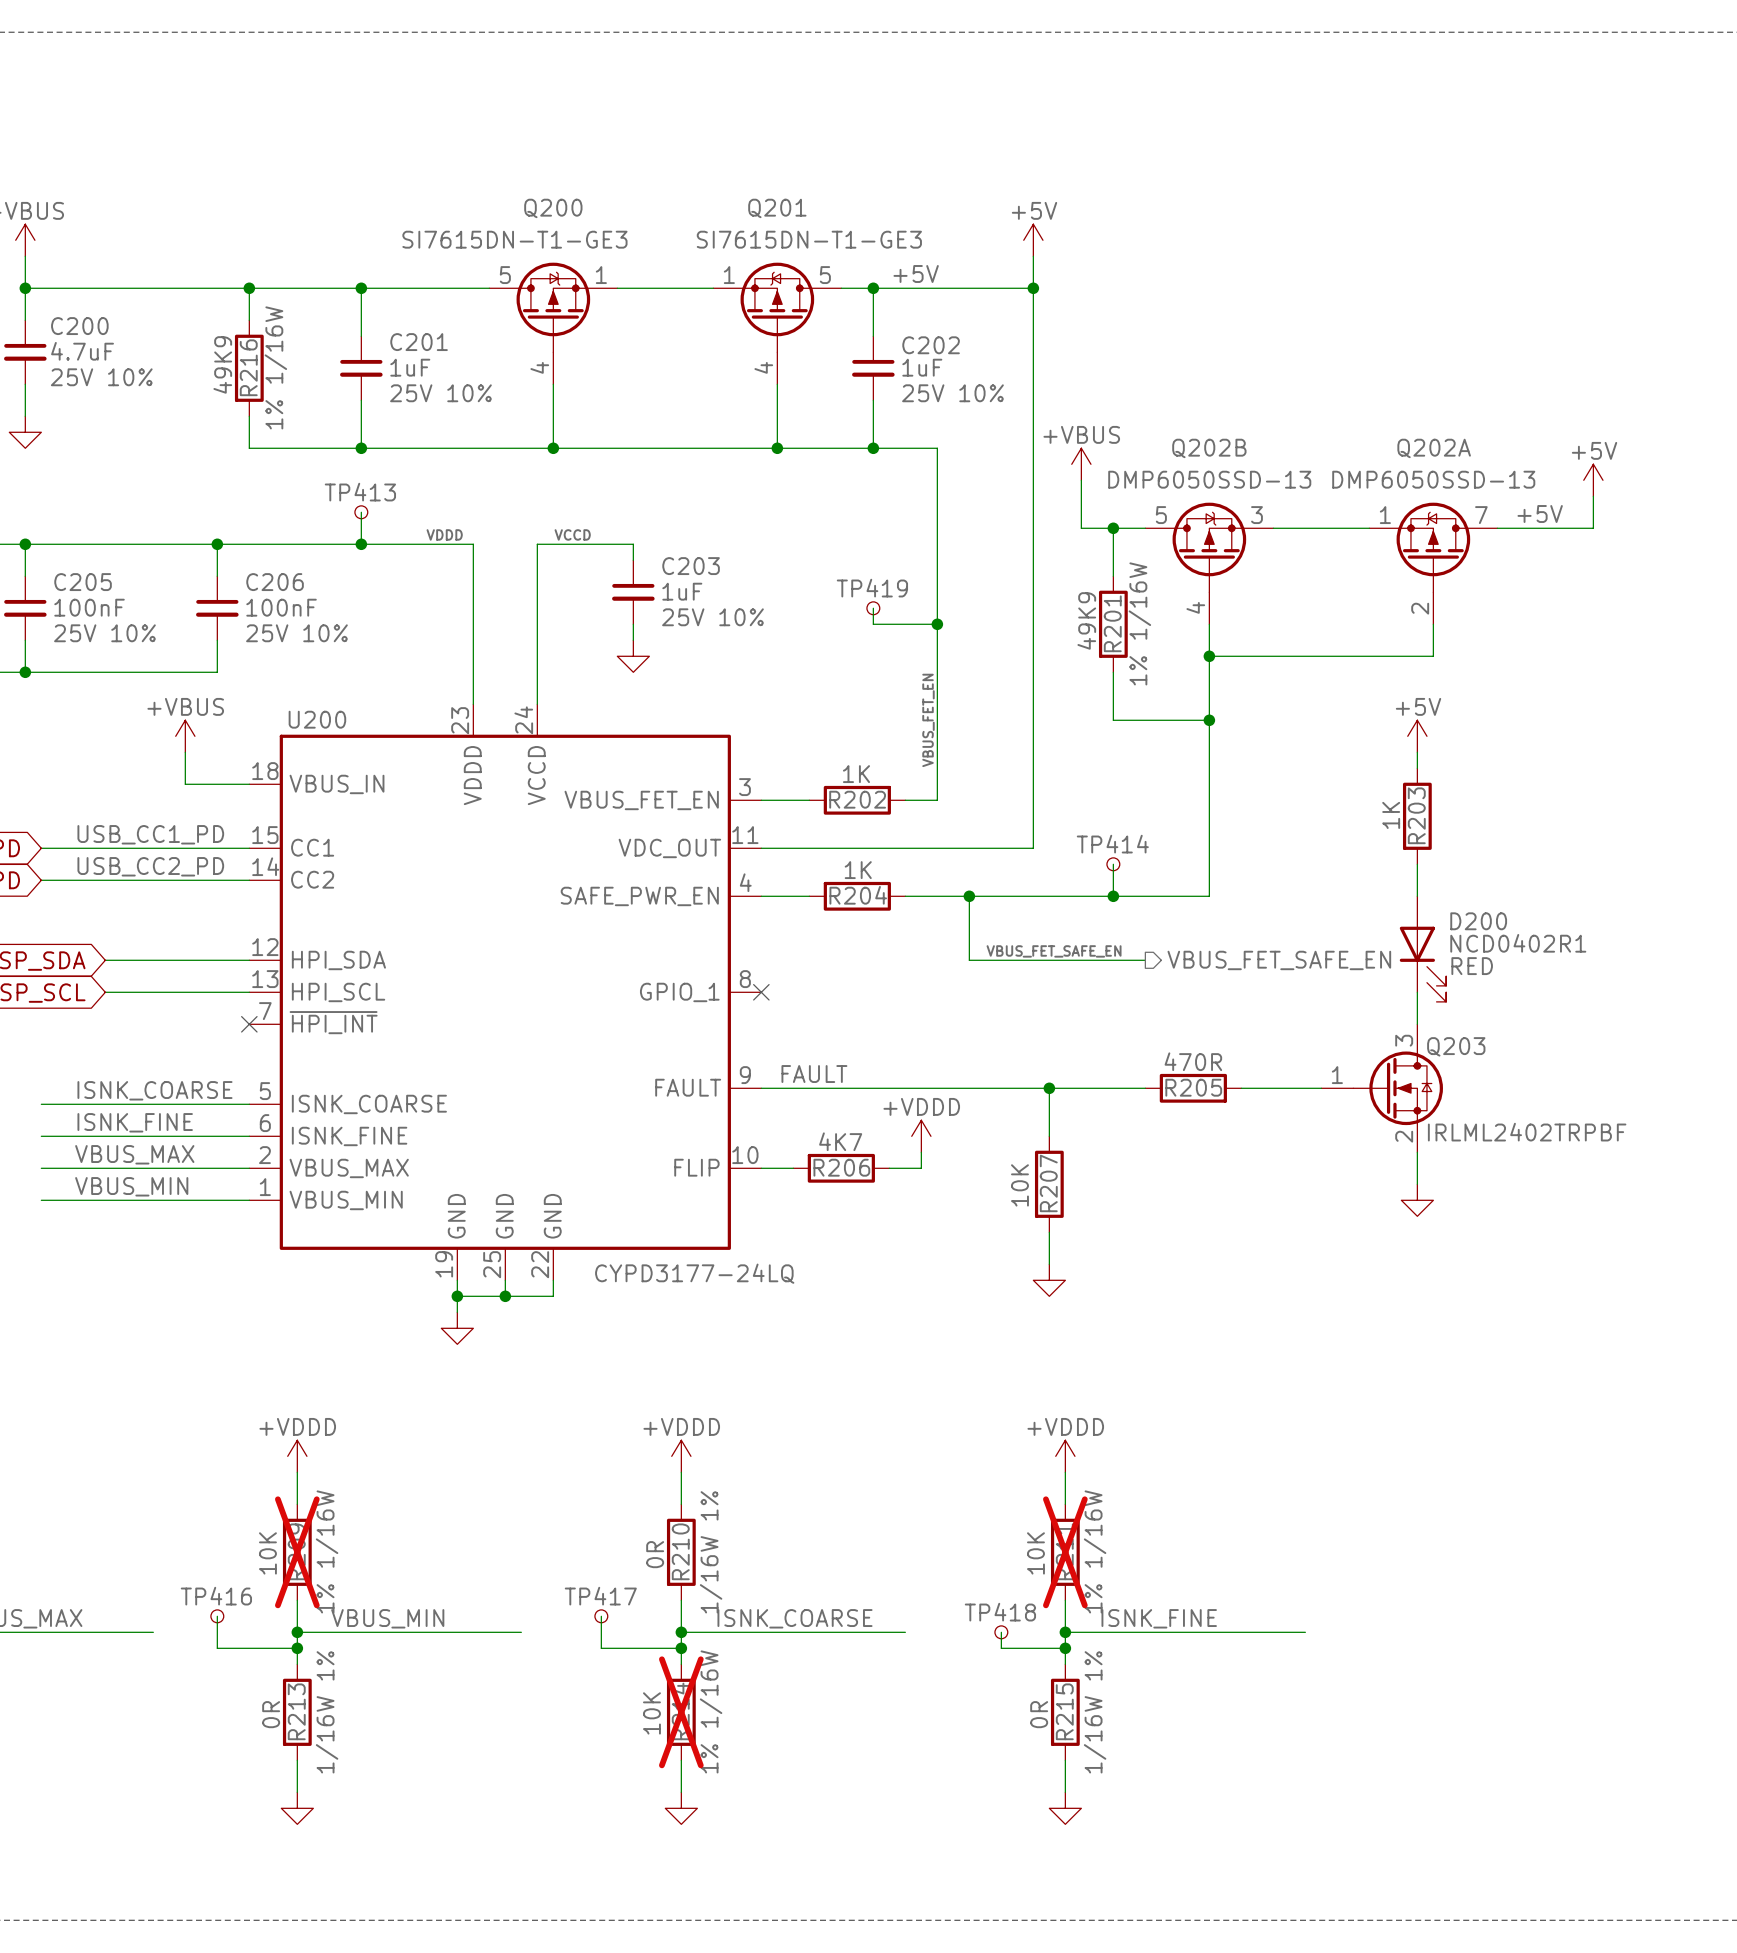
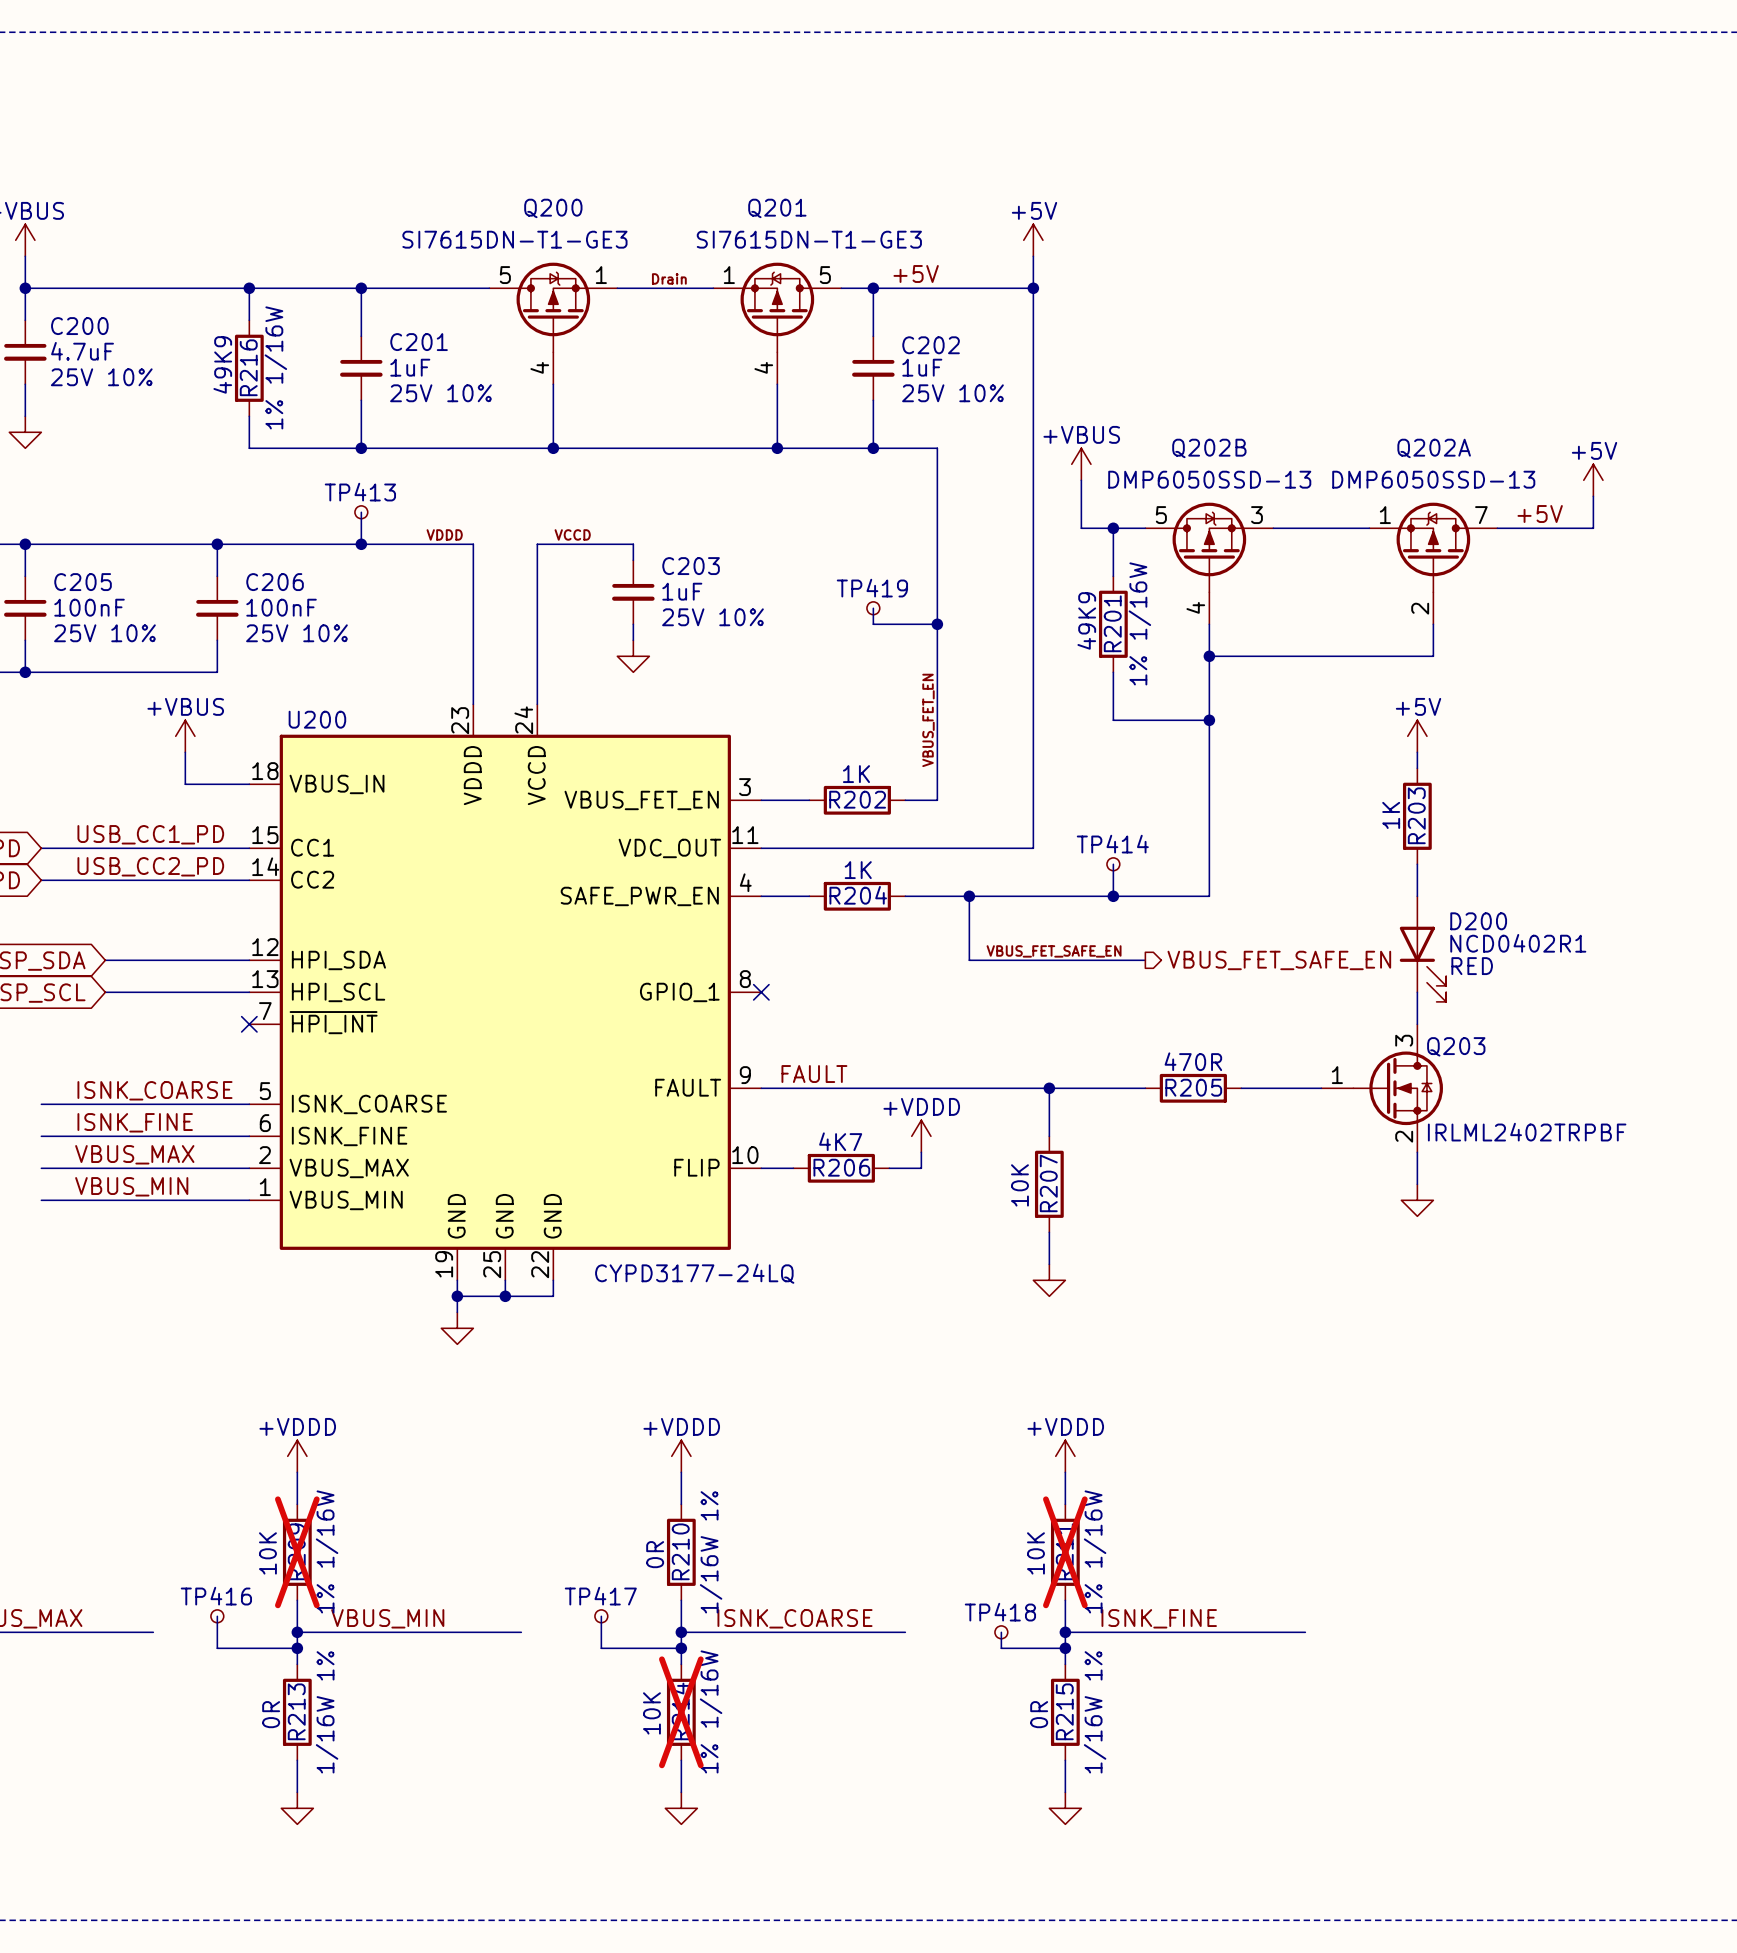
label: none -> Drain (669, 278)

